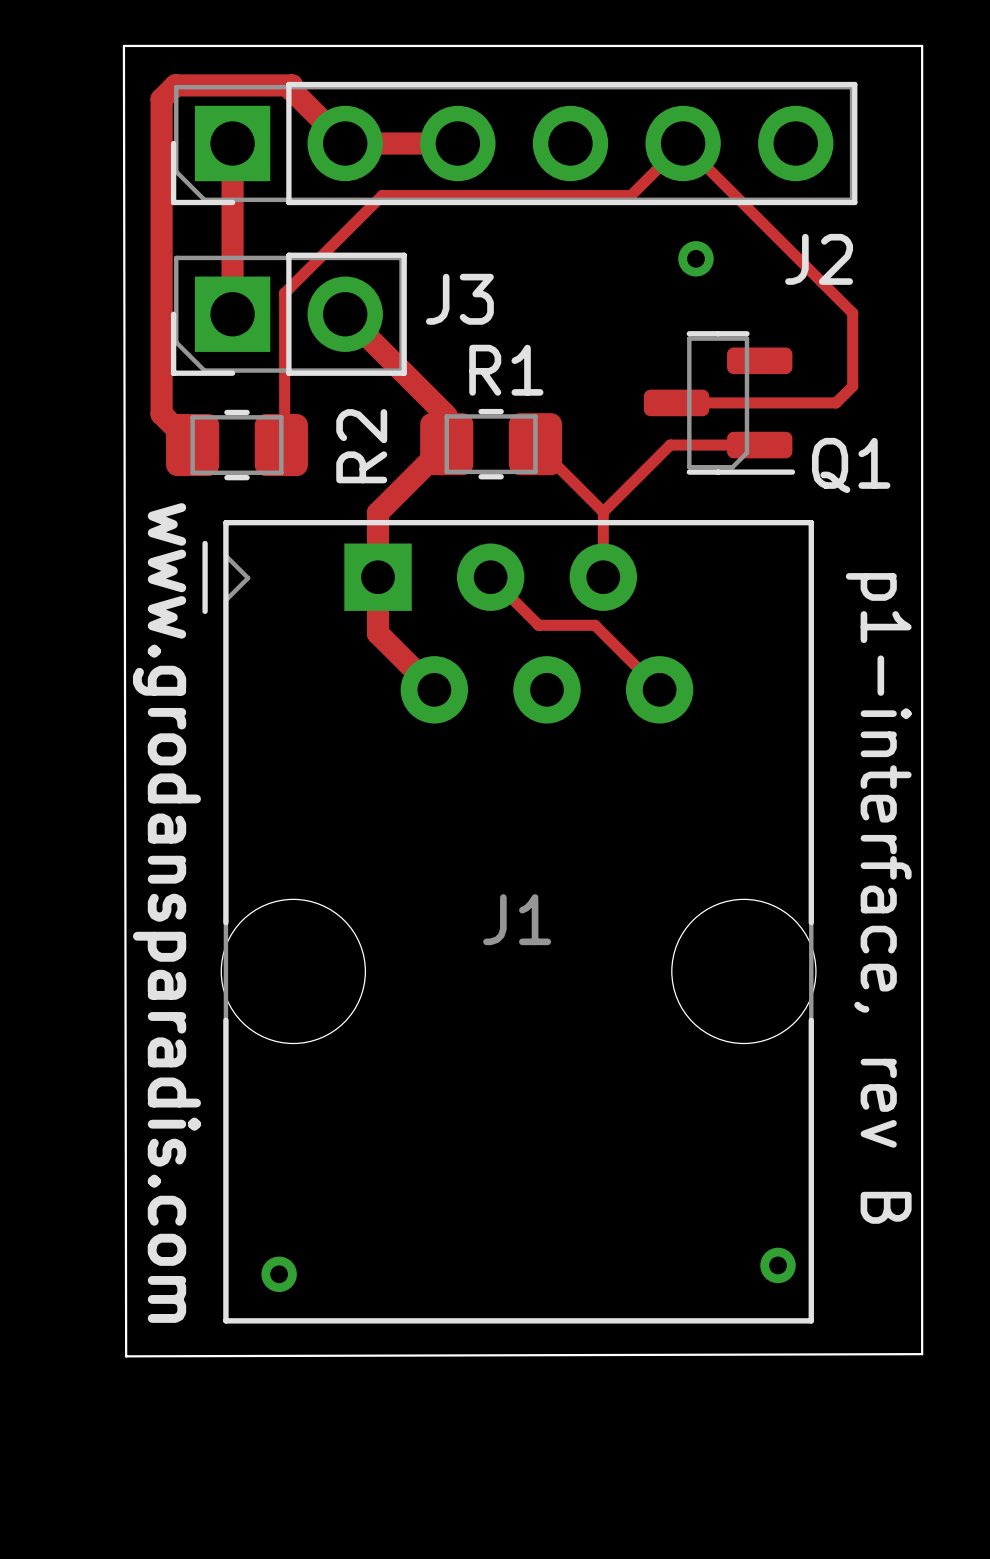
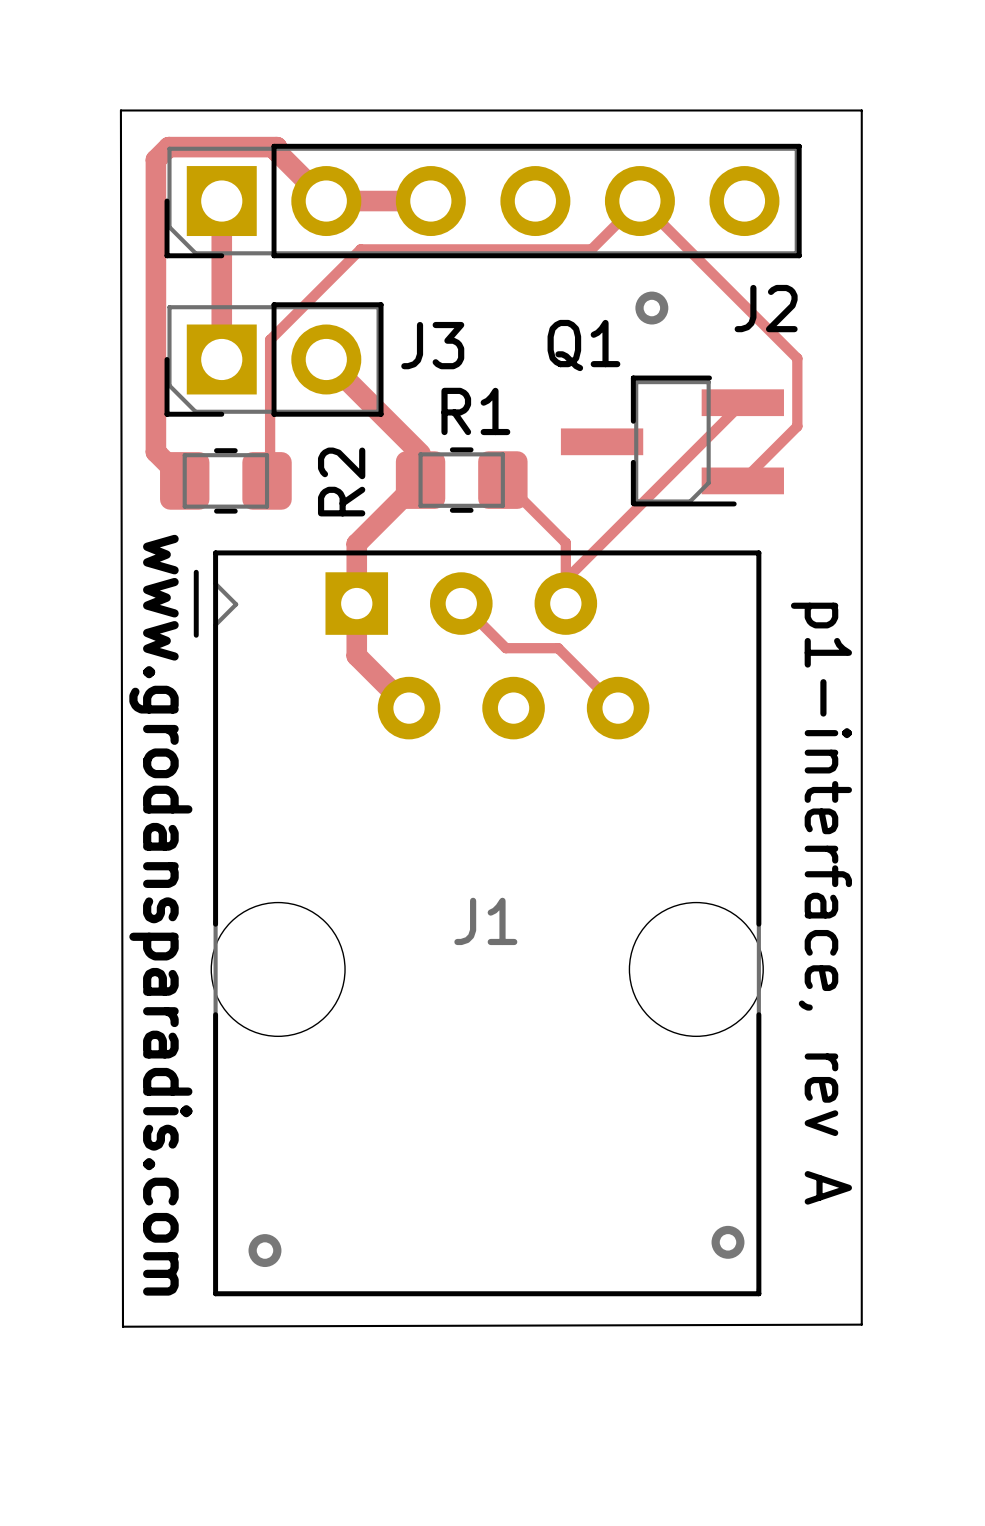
Q1 footprint: [643, 331, 796, 475] -> [560, 375, 784, 507]
top track: none -> (742, 402) (565, 579)
top track: (676, 402) (836, 402) -> (742, 480) (781, 441)
top track: (759, 445) (670, 445) (603, 512) -> none
Q1 name position: Q1 (851, 465) -> Q1 (583, 345)
text: p1-interface, rev B (878, 898) -> p1-interface, rev A (821, 903)

